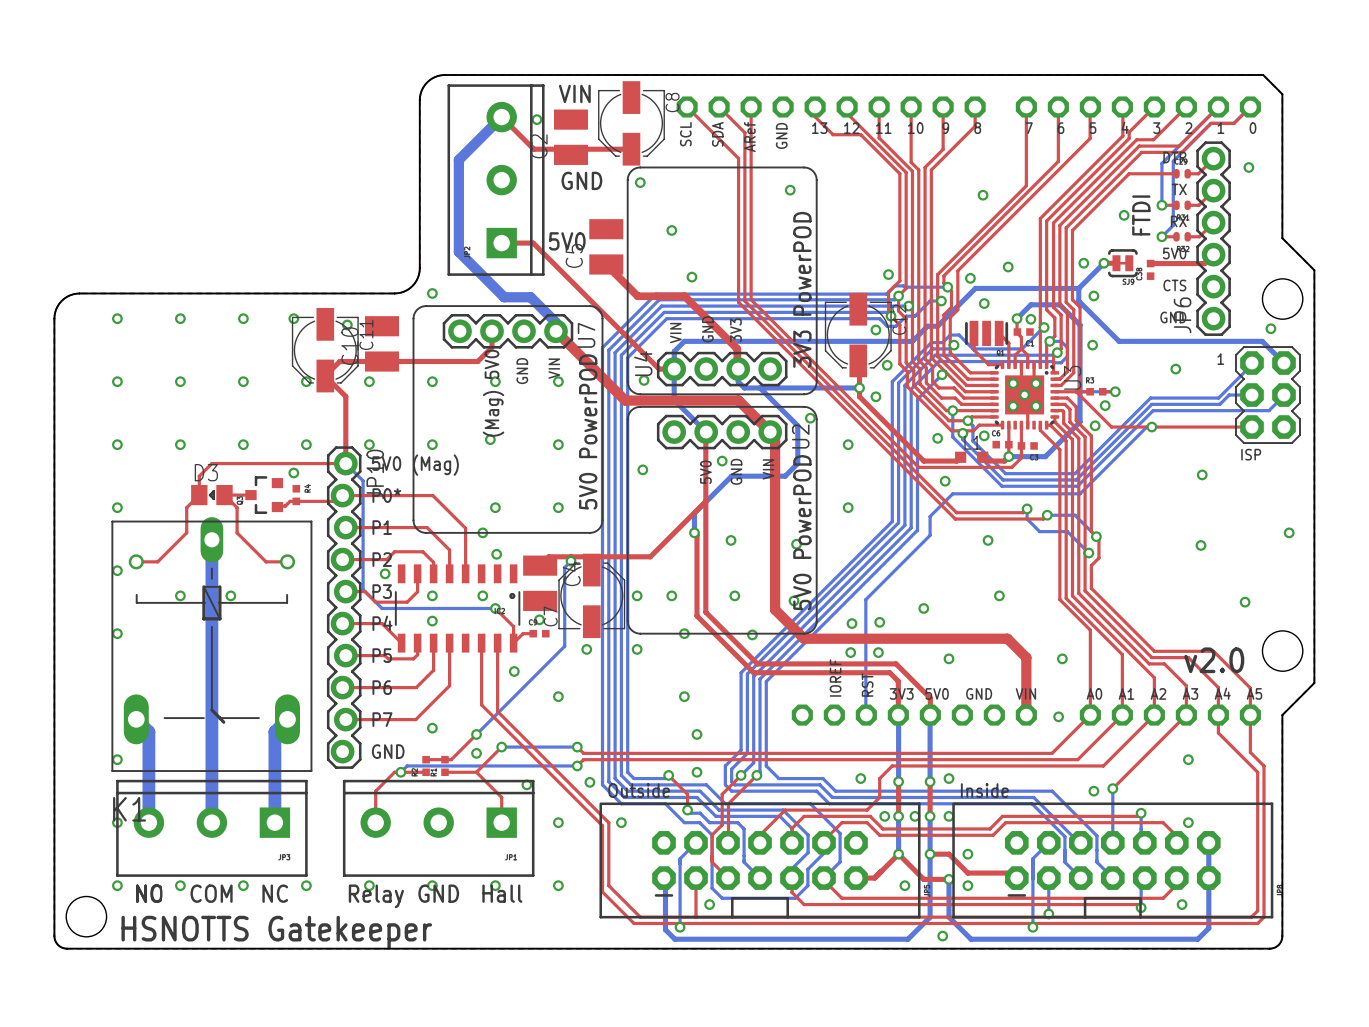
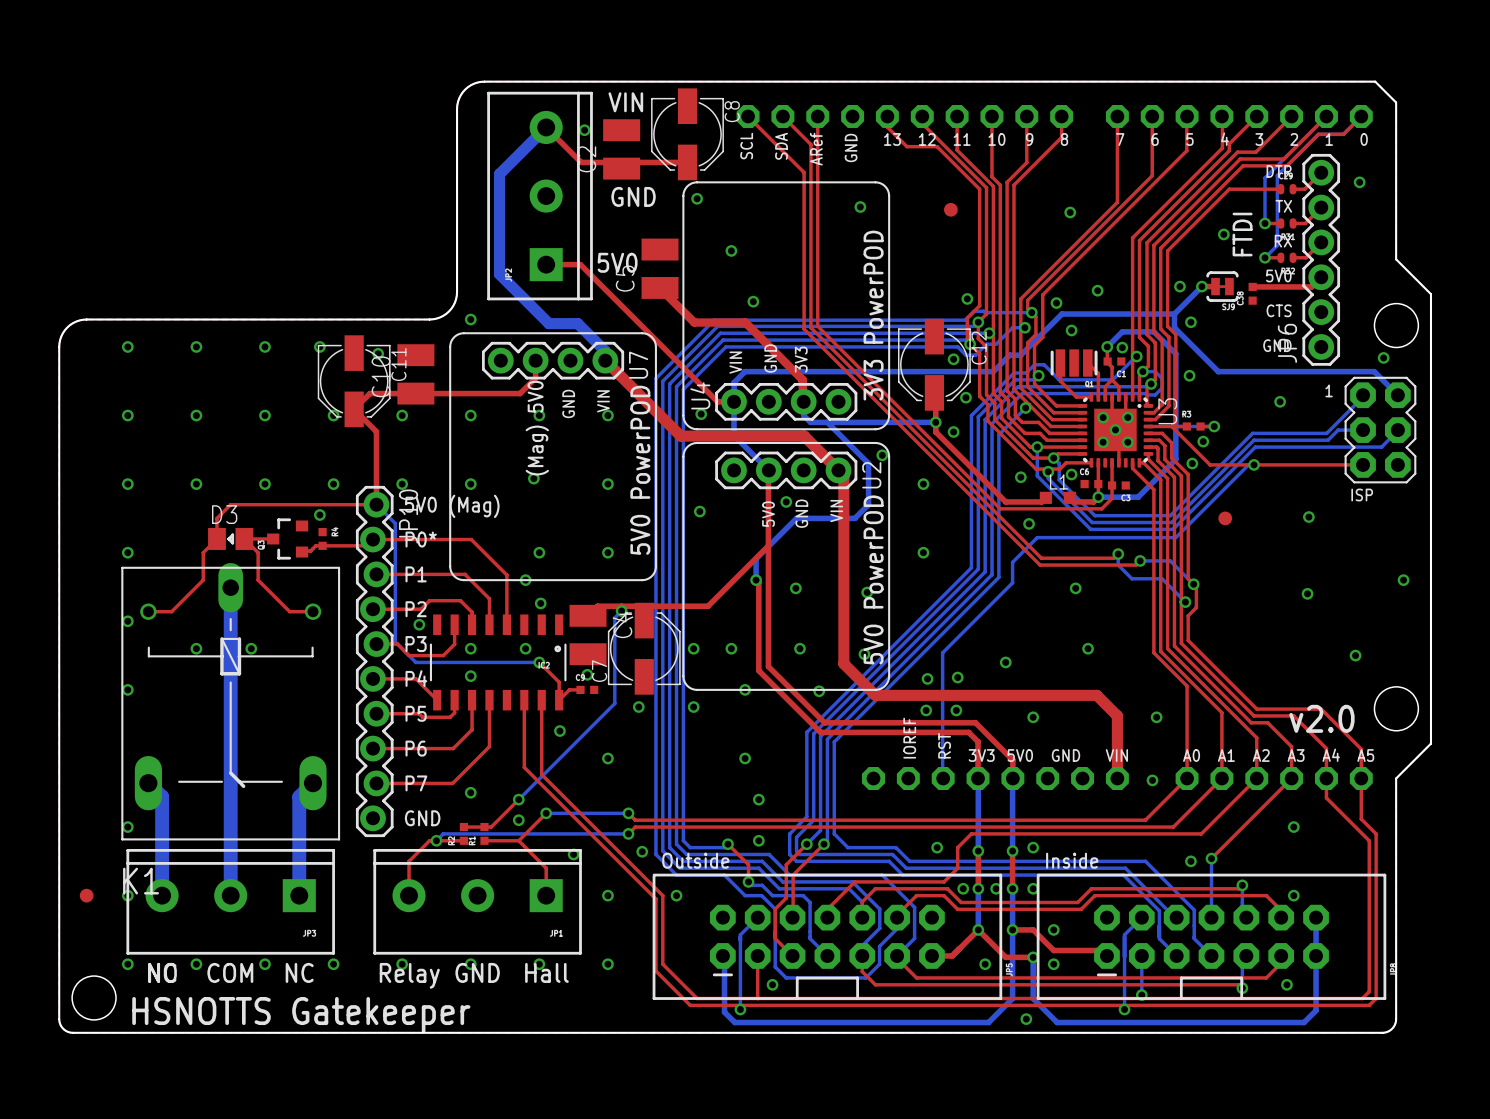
part: none -> (950, 209)
part: none -> (1225, 518)
part: none -> (86, 895)

